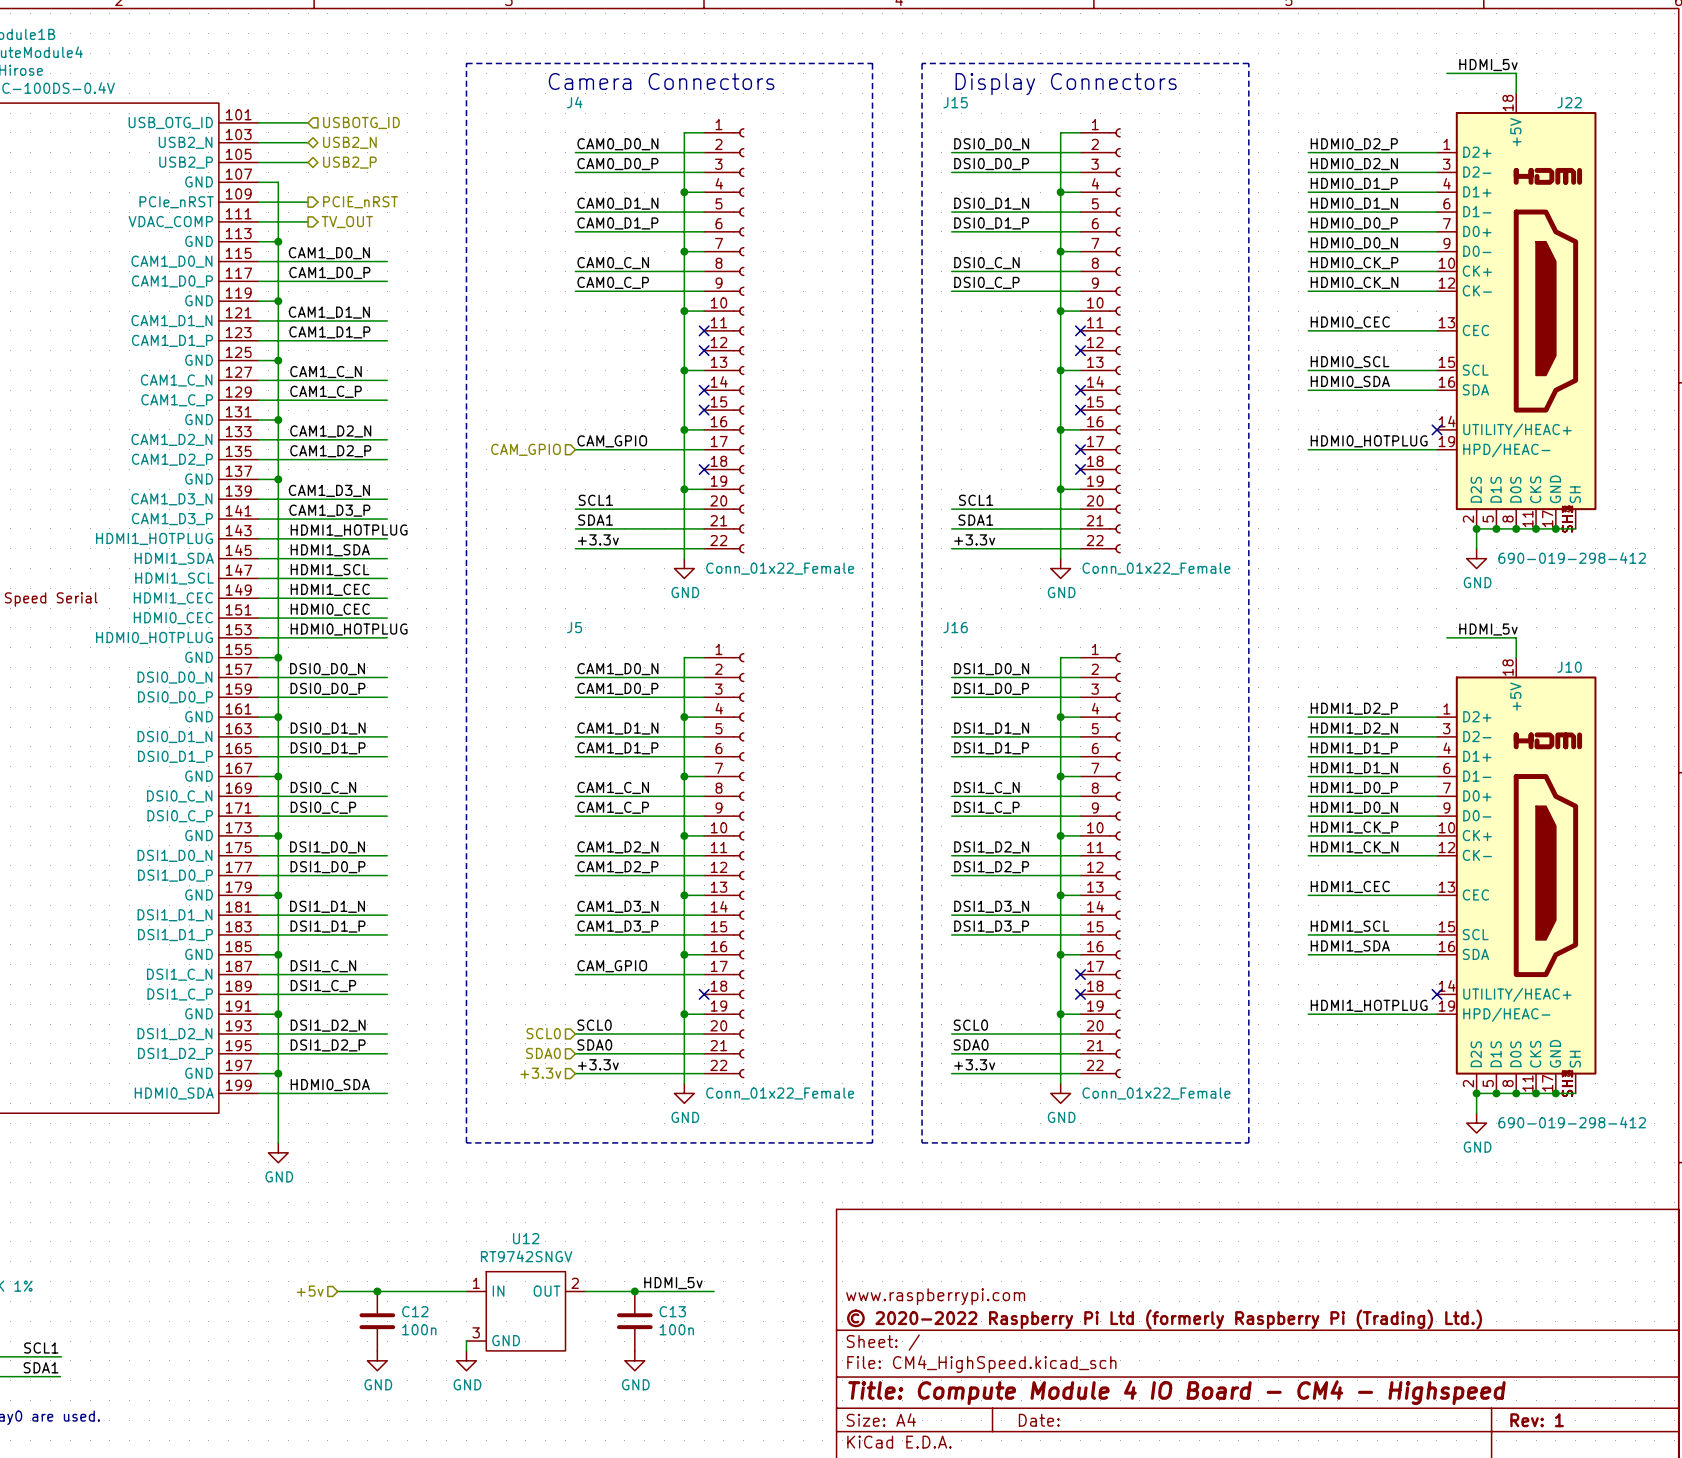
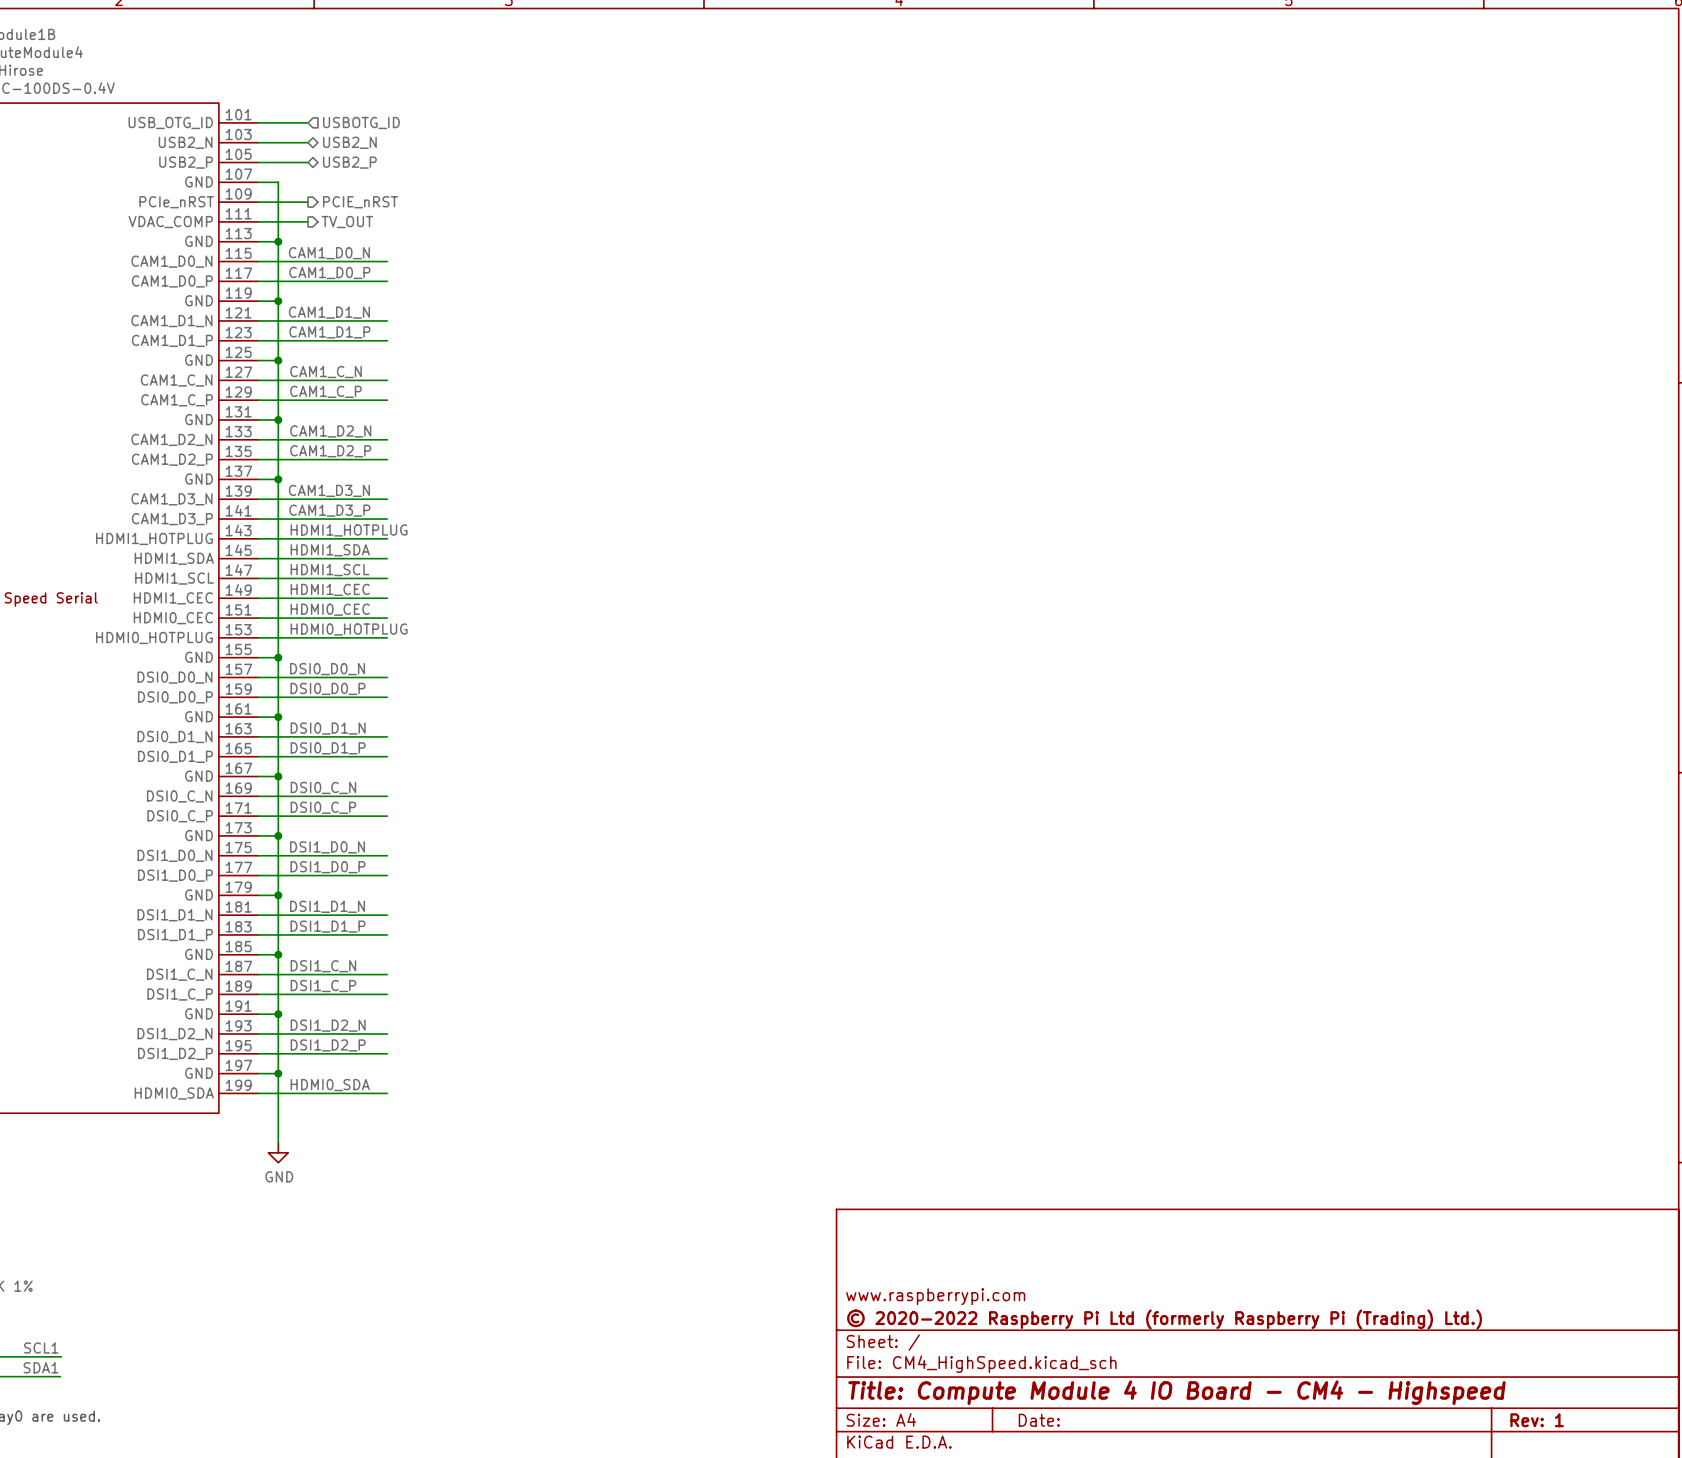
line: (466, 63) (466, 1142) (872, 1142) (872, 63) (466, 63) -> none
line: (922, 63) (1248, 63) (1248, 1142) (922, 1142) (922, 63) -> none
label: HDMI_5v (1488, 65) -> none
wire: (1446, 73) (1516, 73) (1516, 93) -> none
text: Camera Connectors (661, 81) -> none
text: Display Connectors (1066, 84) -> none
wire: (704, 132) (684, 132) (684, 558) -> none
wire: (1080, 132) (1060, 132) (1060, 558) -> none
label: CAM0_D0_N (617, 144) -> none
label: DSI0_D0_N (991, 144) -> none
label: HDMI0_D2_P (1354, 144) -> none
wire: (575, 152) (704, 152) -> none
wire: (951, 152) (1080, 152) -> none
wire: (1308, 152) (1436, 152) -> none
label: CAM0_D0_P (617, 164) -> none
label: DSI0_D0_P (991, 164) -> none
label: HDMI0_D2_N (1354, 164) -> none
wire: (575, 172) (704, 172) -> none
wire: (951, 172) (1080, 172) -> none
wire: (1308, 172) (1436, 172) -> none
label: HDMI0_D1_P (1354, 183) -> none
wire: (684, 192) (704, 192) -> none
junction: (684, 192) -> none
wire: (1060, 192) (1080, 192) -> none
junction: (1060, 192) -> none
wire: (1308, 192) (1436, 192) -> none
label: CAM0_D1_N (617, 203) -> none
label: DSI0_D1_N (991, 203) -> none
label: HDMI0_D1_N (1354, 203) -> none
wire: (575, 212) (704, 212) -> none
wire: (951, 212) (1080, 212) -> none
wire: (1308, 212) (1436, 212) -> none
label: CAM0_D1_P (617, 223) -> none
label: DSI0_D1_P (991, 223) -> none
label: HDMI0_D0_P (1354, 223) -> none
wire: (575, 231) (704, 231) -> none
wire: (951, 231) (1080, 231) -> none
wire: (1308, 231) (1436, 231) -> none
label: HDMI0_D0_N (1354, 243) -> none
wire: (684, 251) (704, 251) -> none
junction: (684, 251) -> none
wire: (1060, 251) (1080, 251) -> none
junction: (1060, 251) -> none
wire: (1308, 251) (1436, 251) -> none
label: CAM0_C_N (613, 263) -> none
label: DSI0_C_N (986, 263) -> none
label: HDMI0_CK_P (1354, 263) -> none
wire: (575, 271) (704, 271) -> none
wire: (951, 271) (1080, 271) -> none
wire: (1308, 271) (1436, 271) -> none
label: CAM0_C_P (613, 282) -> none
label: DSI0_C_P (986, 282) -> none
label: HDMI0_CK_N (1354, 282) -> none
wire: (575, 291) (704, 291) -> none
wire: (951, 291) (1080, 291) -> none
wire: (1308, 291) (1436, 291) -> none
wire: (684, 311) (704, 311) -> none
junction: (684, 311) -> none
wire: (1060, 311) (1080, 311) -> none
junction: (1060, 311) -> none
J22: 690-019-298-412 (1516, 311) -> none
label: HDMI0_CEC (1350, 322) -> none
no-connect mark: (704, 330) -> none
no-connect mark: (1080, 330) -> none
wire: (1308, 330) (1436, 330) -> none
J4: Conn_01x22_Female (723, 340) -> none
J15: Conn_01x22_Female (1100, 340) -> none
no-connect mark: (704, 350) -> none
no-connect mark: (1080, 350) -> none
label: HDMI0_SCL (1350, 362) -> none
wire: (684, 370) (704, 370) -> none
junction: (684, 370) -> none
wire: (1060, 370) (1080, 370) -> none
junction: (1060, 370) -> none
wire: (1308, 370) (1436, 370) -> none
label: HDMI0_SDA (1350, 381) -> none
no-connect mark: (704, 390) -> none
no-connect mark: (1080, 390) -> none
wire: (1308, 390) (1436, 390) -> none
no-connect mark: (704, 410) -> none
no-connect mark: (1080, 410) -> none
wire: (684, 429) (704, 429) -> none
junction: (684, 429) -> none
wire: (1060, 429) (1080, 429) -> none
junction: (1060, 429) -> none
no-connect mark: (1436, 429) -> none
label: CAM_GPIO (612, 441) -> none
label: HDMI0_HOTPLUG (1369, 441) -> none
hierarchical label: CAM_GPIO (525, 449) -> none
wire: (575, 449) (704, 449) -> none
no-connect mark: (1080, 449) -> none
wire: (1308, 449) (1436, 449) -> none
no-connect mark: (704, 469) -> none
no-connect mark: (1080, 469) -> none
wire: (684, 489) (704, 489) -> none
junction: (684, 489) -> none
wire: (1060, 489) (1080, 489) -> none
junction: (1060, 489) -> none
label: SCL1 (595, 500) -> none
label: SCL1 (976, 500) -> none
wire: (575, 509) (704, 509) -> none
wire: (951, 509) (1080, 509) -> none
label: SDA1 (595, 520) -> none
label: SDA1 (975, 520) -> none
wire: (575, 528) (704, 528) -> none
wire: (951, 528) (1080, 528) -> none
junction: (1476, 528) -> none
junction: (1496, 528) -> none
junction: (1516, 528) -> none
junction: (1536, 528) -> none
junction: (1555, 528) -> none
wire: (1575, 528) (1476, 528) (1476, 548) -> none
label: +3.3v (598, 539) -> none
label: +3.3v (974, 539) -> none
wire: (575, 548) (704, 548) -> none
wire: (951, 548) (1080, 548) -> none
power symbol: GND (1476, 558) -> none
power symbol: GND (684, 568) -> none
power symbol: GND (1060, 568) -> none
label: HDMI_5v (1488, 629) -> none
wire: (1446, 637) (1516, 637) (1516, 657) -> none
wire: (704, 657) (684, 657) (684, 1083) -> none
wire: (1080, 657) (1060, 657) (1060, 1083) -> none
label: CAM1_D0_N (617, 669) -> none
label: DSI1_D0_N (991, 669) -> none
wire: (575, 677) (704, 677) -> none
wire: (951, 677) (1080, 677) -> none
label: CAM1_D0_P (617, 688) -> none
label: DSI1_D0_P (991, 688) -> none
wire: (575, 697) (704, 697) -> none
wire: (951, 697) (1080, 697) -> none
label: HDMI1_D2_P (1354, 708) -> none
wire: (684, 717) (704, 717) -> none
junction: (684, 717) -> none
wire: (1060, 717) (1080, 717) -> none
junction: (1060, 717) -> none
wire: (1308, 717) (1436, 717) -> none
label: CAM1_D1_N (617, 728) -> none
label: DSI1_D1_N (991, 728) -> none
label: HDMI1_D2_N (1354, 728) -> none
wire: (575, 736) (704, 736) -> none
wire: (951, 736) (1080, 736) -> none
wire: (1308, 736) (1436, 736) -> none
label: CAM1_D1_P (617, 748) -> none
label: DSI1_D1_P (991, 748) -> none
label: HDMI1_D1_P (1354, 748) -> none
wire: (575, 756) (704, 756) -> none
wire: (951, 756) (1080, 756) -> none
wire: (1308, 756) (1436, 756) -> none
label: HDMI1_D1_N (1354, 768) -> none
wire: (684, 776) (704, 776) -> none
junction: (684, 776) -> none
wire: (1060, 776) (1080, 776) -> none
junction: (1060, 776) -> none
wire: (1308, 776) (1436, 776) -> none
label: CAM1_C_N (613, 787) -> none
label: DSI1_C_N (986, 787) -> none
label: HDMI1_D0_P (1354, 787) -> none
wire: (575, 796) (704, 796) -> none
wire: (951, 796) (1080, 796) -> none
wire: (1308, 796) (1436, 796) -> none
label: CAM1_C_P (613, 807) -> none
label: DSI1_C_P (986, 807) -> none
label: HDMI1_D0_N (1354, 807) -> none
wire: (575, 816) (704, 816) -> none
wire: (951, 816) (1080, 816) -> none
wire: (1308, 816) (1436, 816) -> none
label: HDMI1_CK_P (1354, 827) -> none
wire: (684, 835) (704, 835) -> none
junction: (684, 835) -> none
wire: (1060, 835) (1080, 835) -> none
junction: (1060, 835) -> none
wire: (1308, 835) (1436, 835) -> none
label: CAM1_D2_N (617, 847) -> none
label: DSI1_D2_N (991, 847) -> none
label: HDMI1_CK_N (1354, 847) -> none
wire: (575, 855) (704, 855) -> none
wire: (951, 855) (1080, 855) -> none
wire: (1308, 855) (1436, 855) -> none
J5: Conn_01x22_Female (723, 865) -> none
J16: Conn_01x22_Female (1100, 865) -> none
label: CAM1_D2_P (617, 867) -> none
label: DSI1_D2_P (991, 867) -> none
wire: (575, 875) (704, 875) -> none
wire: (951, 875) (1080, 875) -> none
J10: 690-019-298-412 (1516, 875) -> none
label: HDMI1_CEC (1350, 886) -> none
wire: (684, 895) (704, 895) -> none
junction: (684, 895) -> none
wire: (1060, 895) (1080, 895) -> none
junction: (1060, 895) -> none
wire: (1308, 895) (1436, 895) -> none
label: CAM1_D3_N (617, 906) -> none
label: DSI1_D3_N (991, 906) -> none
wire: (575, 915) (704, 915) -> none
wire: (951, 915) (1080, 915) -> none
label: CAM1_D3_P (617, 926) -> none
label: DSI1_D3_P (991, 926) -> none
label: HDMI1_SCL (1350, 926) -> none
wire: (575, 934) (704, 934) -> none
wire: (951, 934) (1080, 934) -> none
wire: (1308, 934) (1436, 934) -> none
label: HDMI1_SDA (1350, 946) -> none
wire: (684, 954) (704, 954) -> none
junction: (684, 954) -> none
wire: (1060, 954) (1080, 954) -> none
junction: (1060, 954) -> none
wire: (1308, 954) (1436, 954) -> none
label: CAM_GPIO (612, 966) -> none
wire: (575, 974) (704, 974) -> none
no-connect mark: (1080, 974) -> none
no-connect mark: (704, 994) -> none
no-connect mark: (1080, 994) -> none
no-connect mark: (1436, 994) -> none
label: HDMI1_HOTPLUG (1369, 1005) -> none
wire: (684, 1014) (704, 1014) -> none
junction: (684, 1014) -> none
wire: (1060, 1014) (1080, 1014) -> none
junction: (1060, 1014) -> none
wire: (1308, 1014) (1436, 1014) -> none
label: SCL0 (594, 1025) -> none
label: SCL0 (970, 1025) -> none
hierarchical label: SCL0 (543, 1033) -> none
wire: (575, 1034) (704, 1034) -> none
wire: (951, 1034) (1080, 1034) -> none
label: SDA0 (594, 1044) -> none
label: SDA0 (971, 1044) -> none
hierarchical label: SDA0 (543, 1053) -> none
wire: (575, 1053) (704, 1053) -> none
wire: (951, 1053) (1080, 1053) -> none
label: +3.3v (598, 1064) -> none
label: +3.3v (974, 1064) -> none
hierarchical label: +3.3v (540, 1073) -> none
wire: (575, 1073) (704, 1073) -> none
wire: (951, 1073) (1080, 1073) -> none
power symbol: GND (684, 1093) -> none
power symbol: GND (1060, 1093) -> none
junction: (1476, 1093) -> none
junction: (1496, 1093) -> none
junction: (1516, 1093) -> none
junction: (1536, 1093) -> none
junction: (1555, 1093) -> none
wire: (1575, 1093) (1476, 1093) (1476, 1113) -> none
power symbol: GND (1476, 1123) -> none
label: HDMI_5v (673, 1283) -> none
hierarchical label: +5v (310, 1291) -> none
wire: (337, 1291) (466, 1291) -> none
junction: (377, 1291) -> none
wire: (585, 1291) (714, 1291) -> none
junction: (634, 1291) -> none
U12: RT9742SNGV (525, 1311) -> none
C12: 100n (377, 1321) -> none
C13: 100n (634, 1321) -> none
wire: (466, 1341) (466, 1350) -> none
power symbol: GND (377, 1360) -> none
power symbol: GND (466, 1360) -> none
power symbol: GND (634, 1360) -> none

